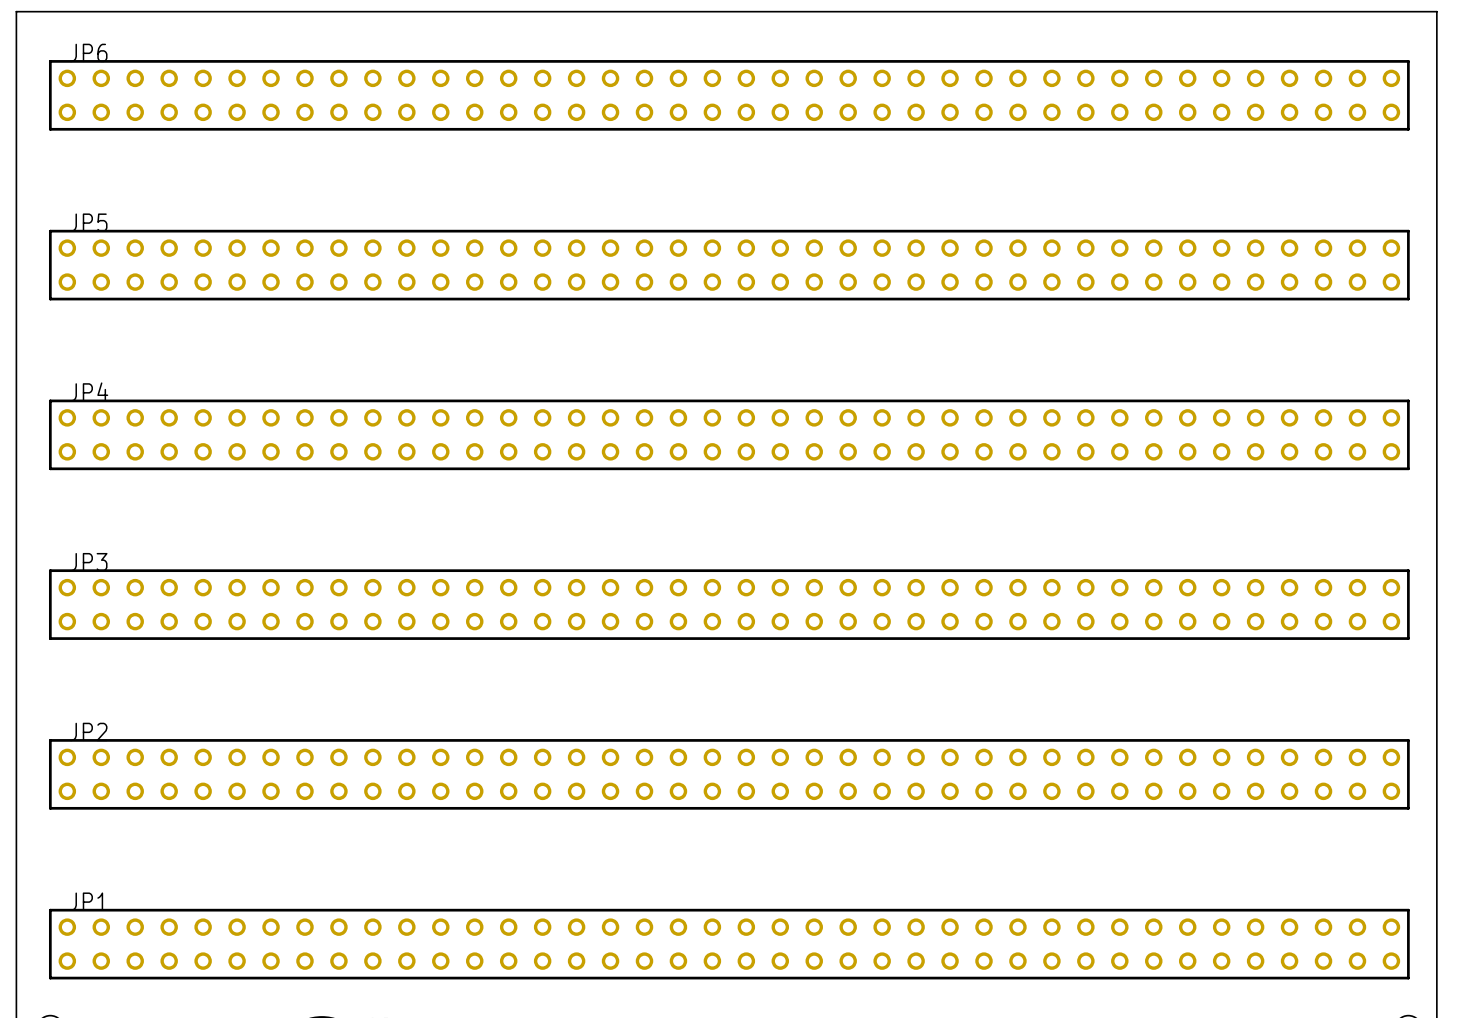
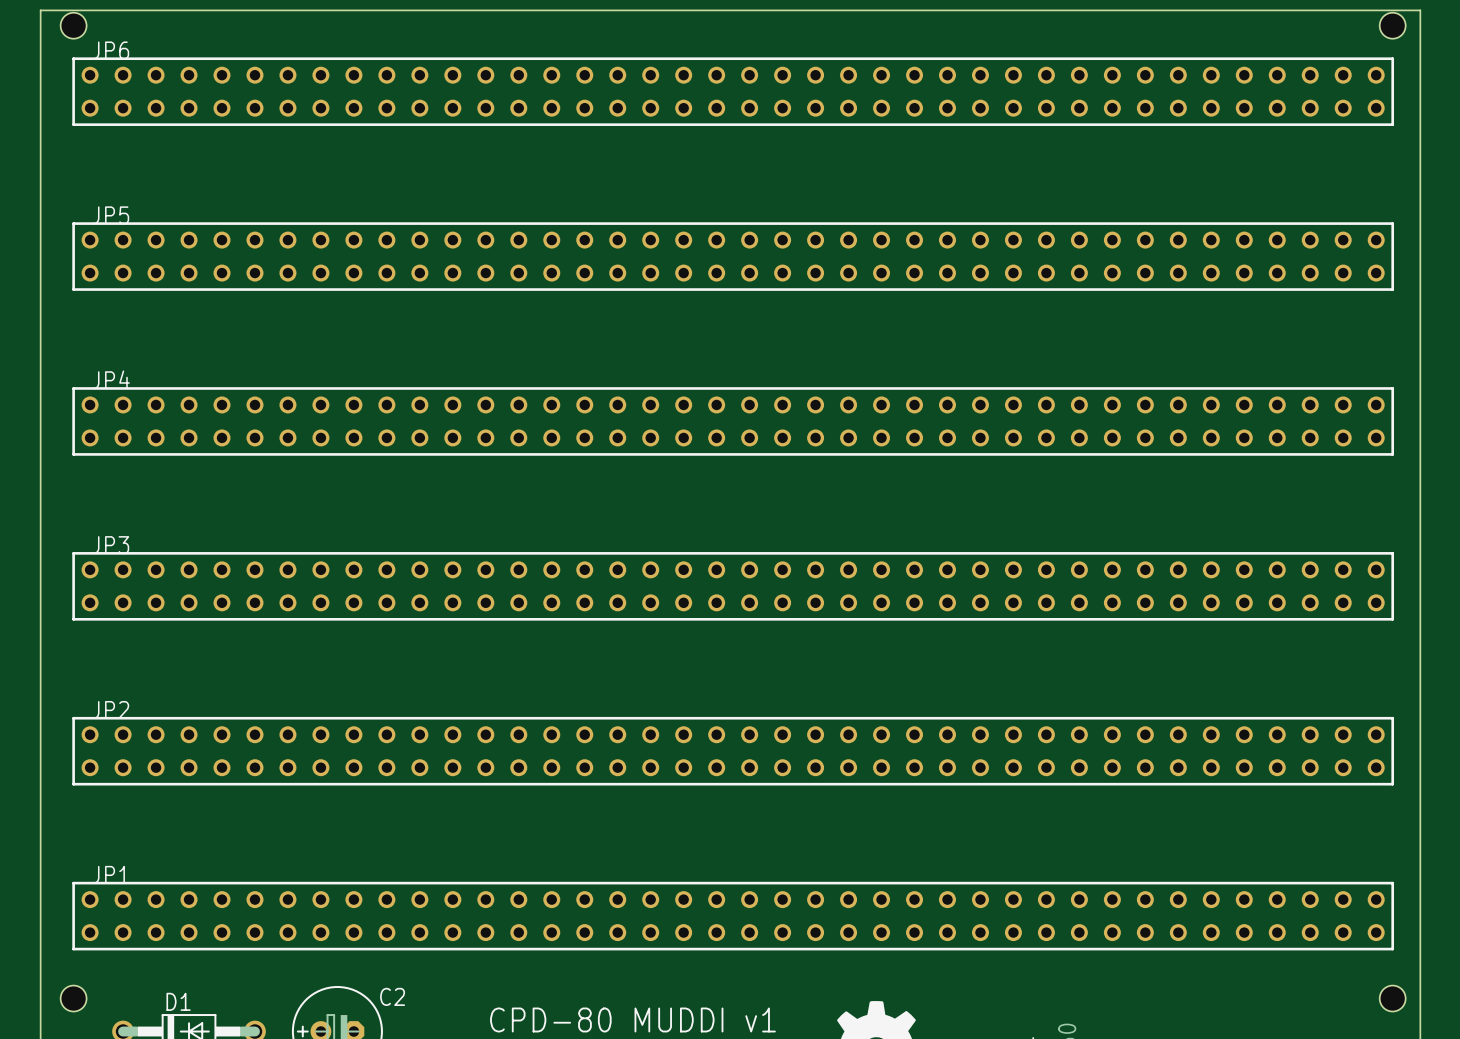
hole: none -> (73, 25)
hole: none -> (1392, 25)

